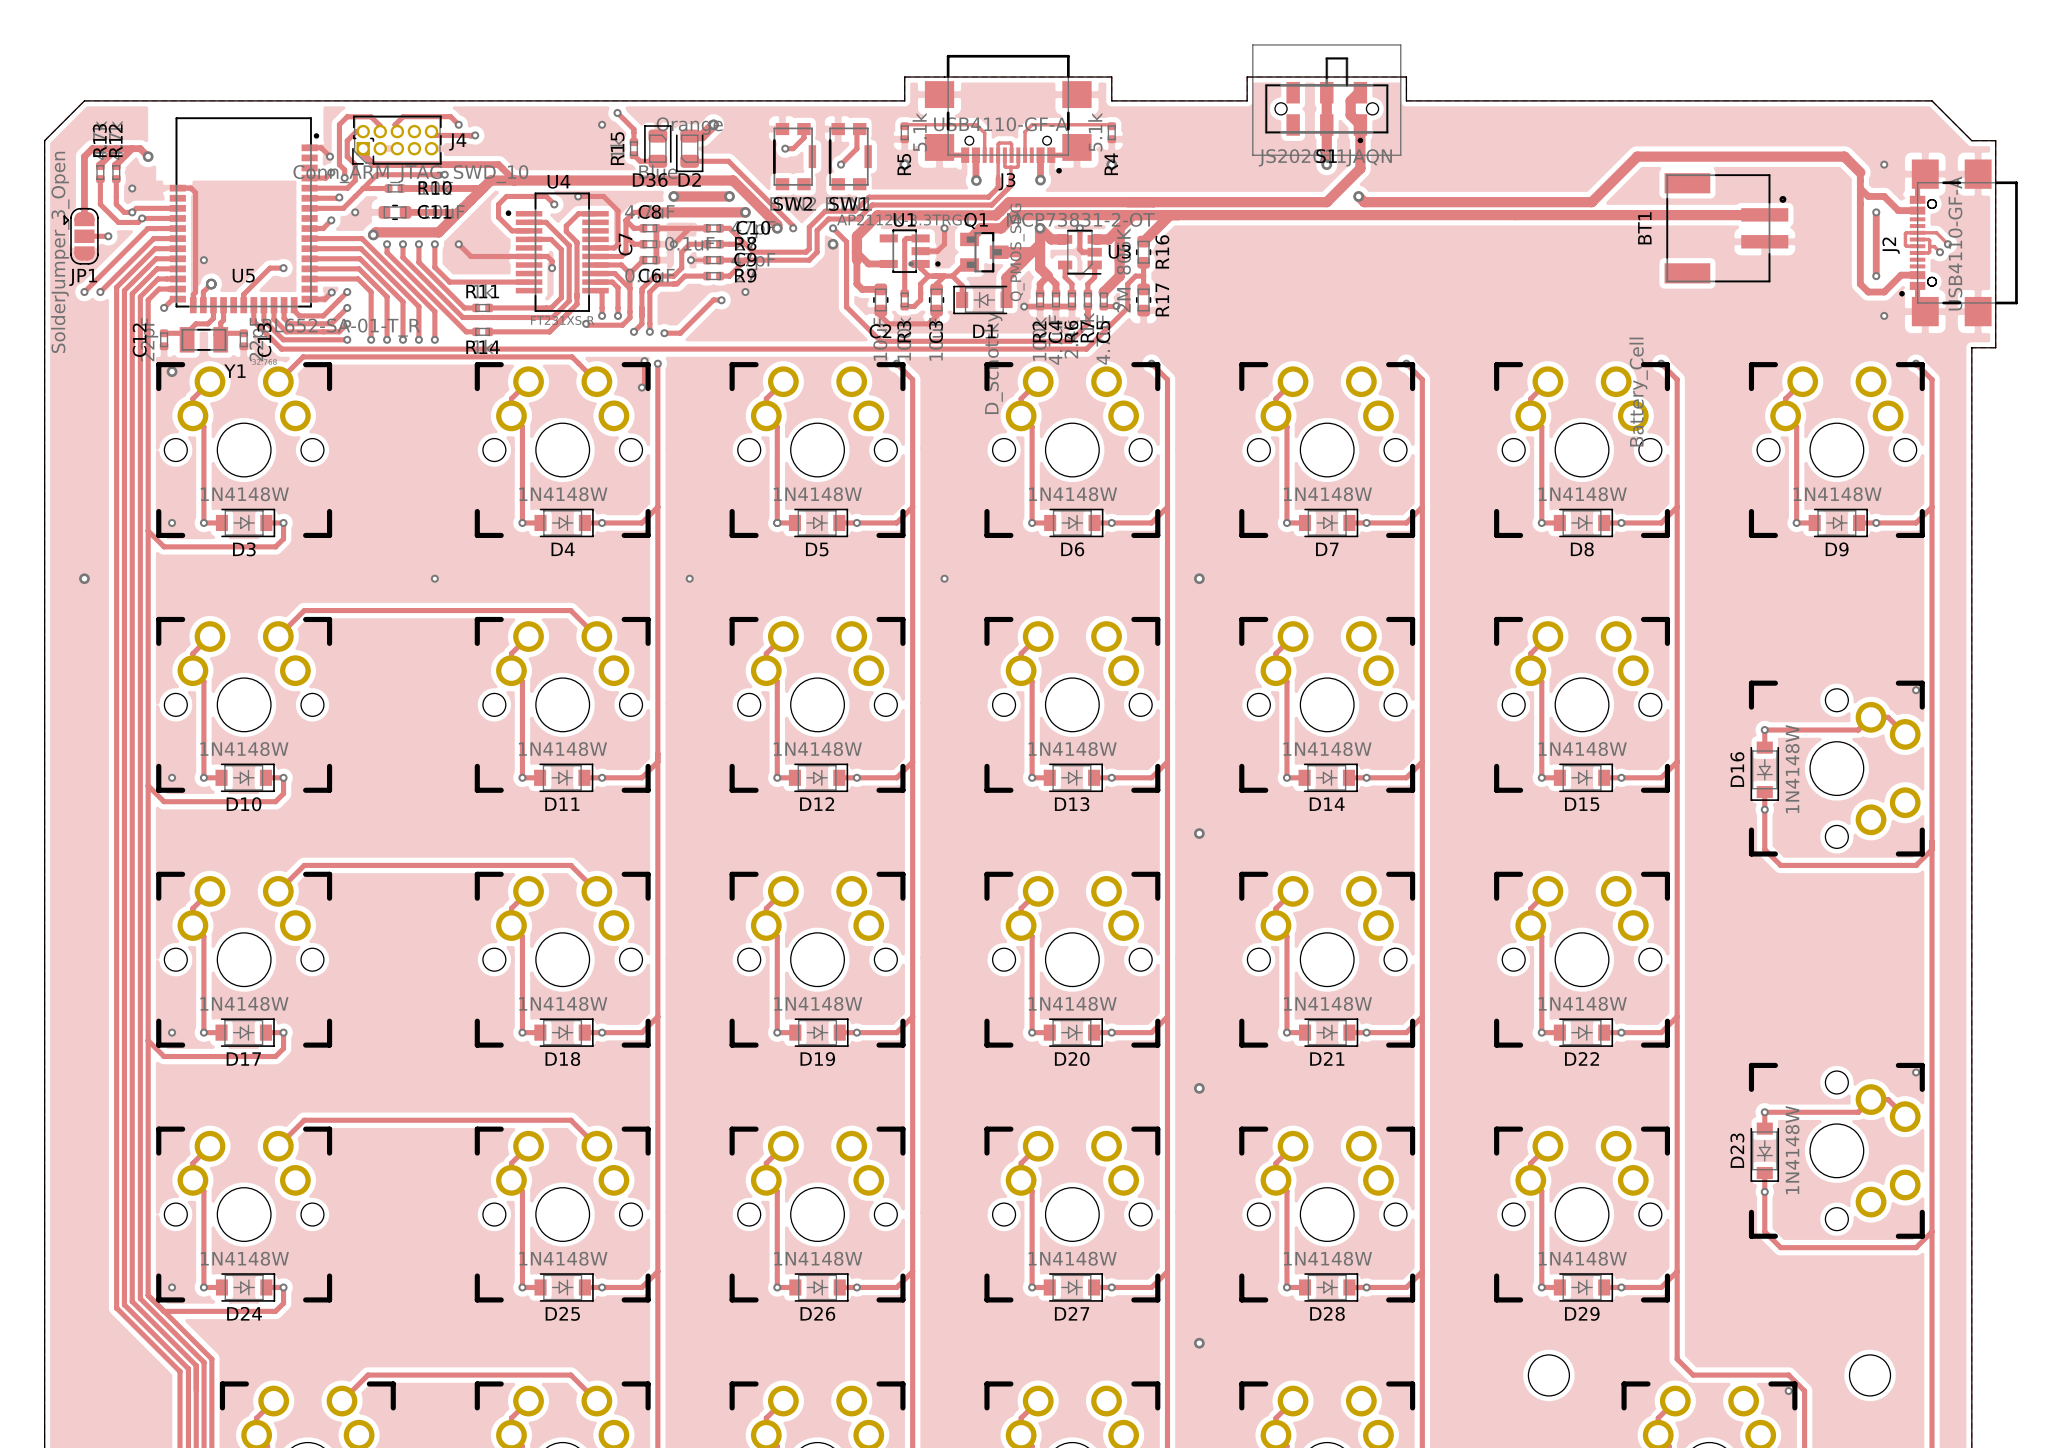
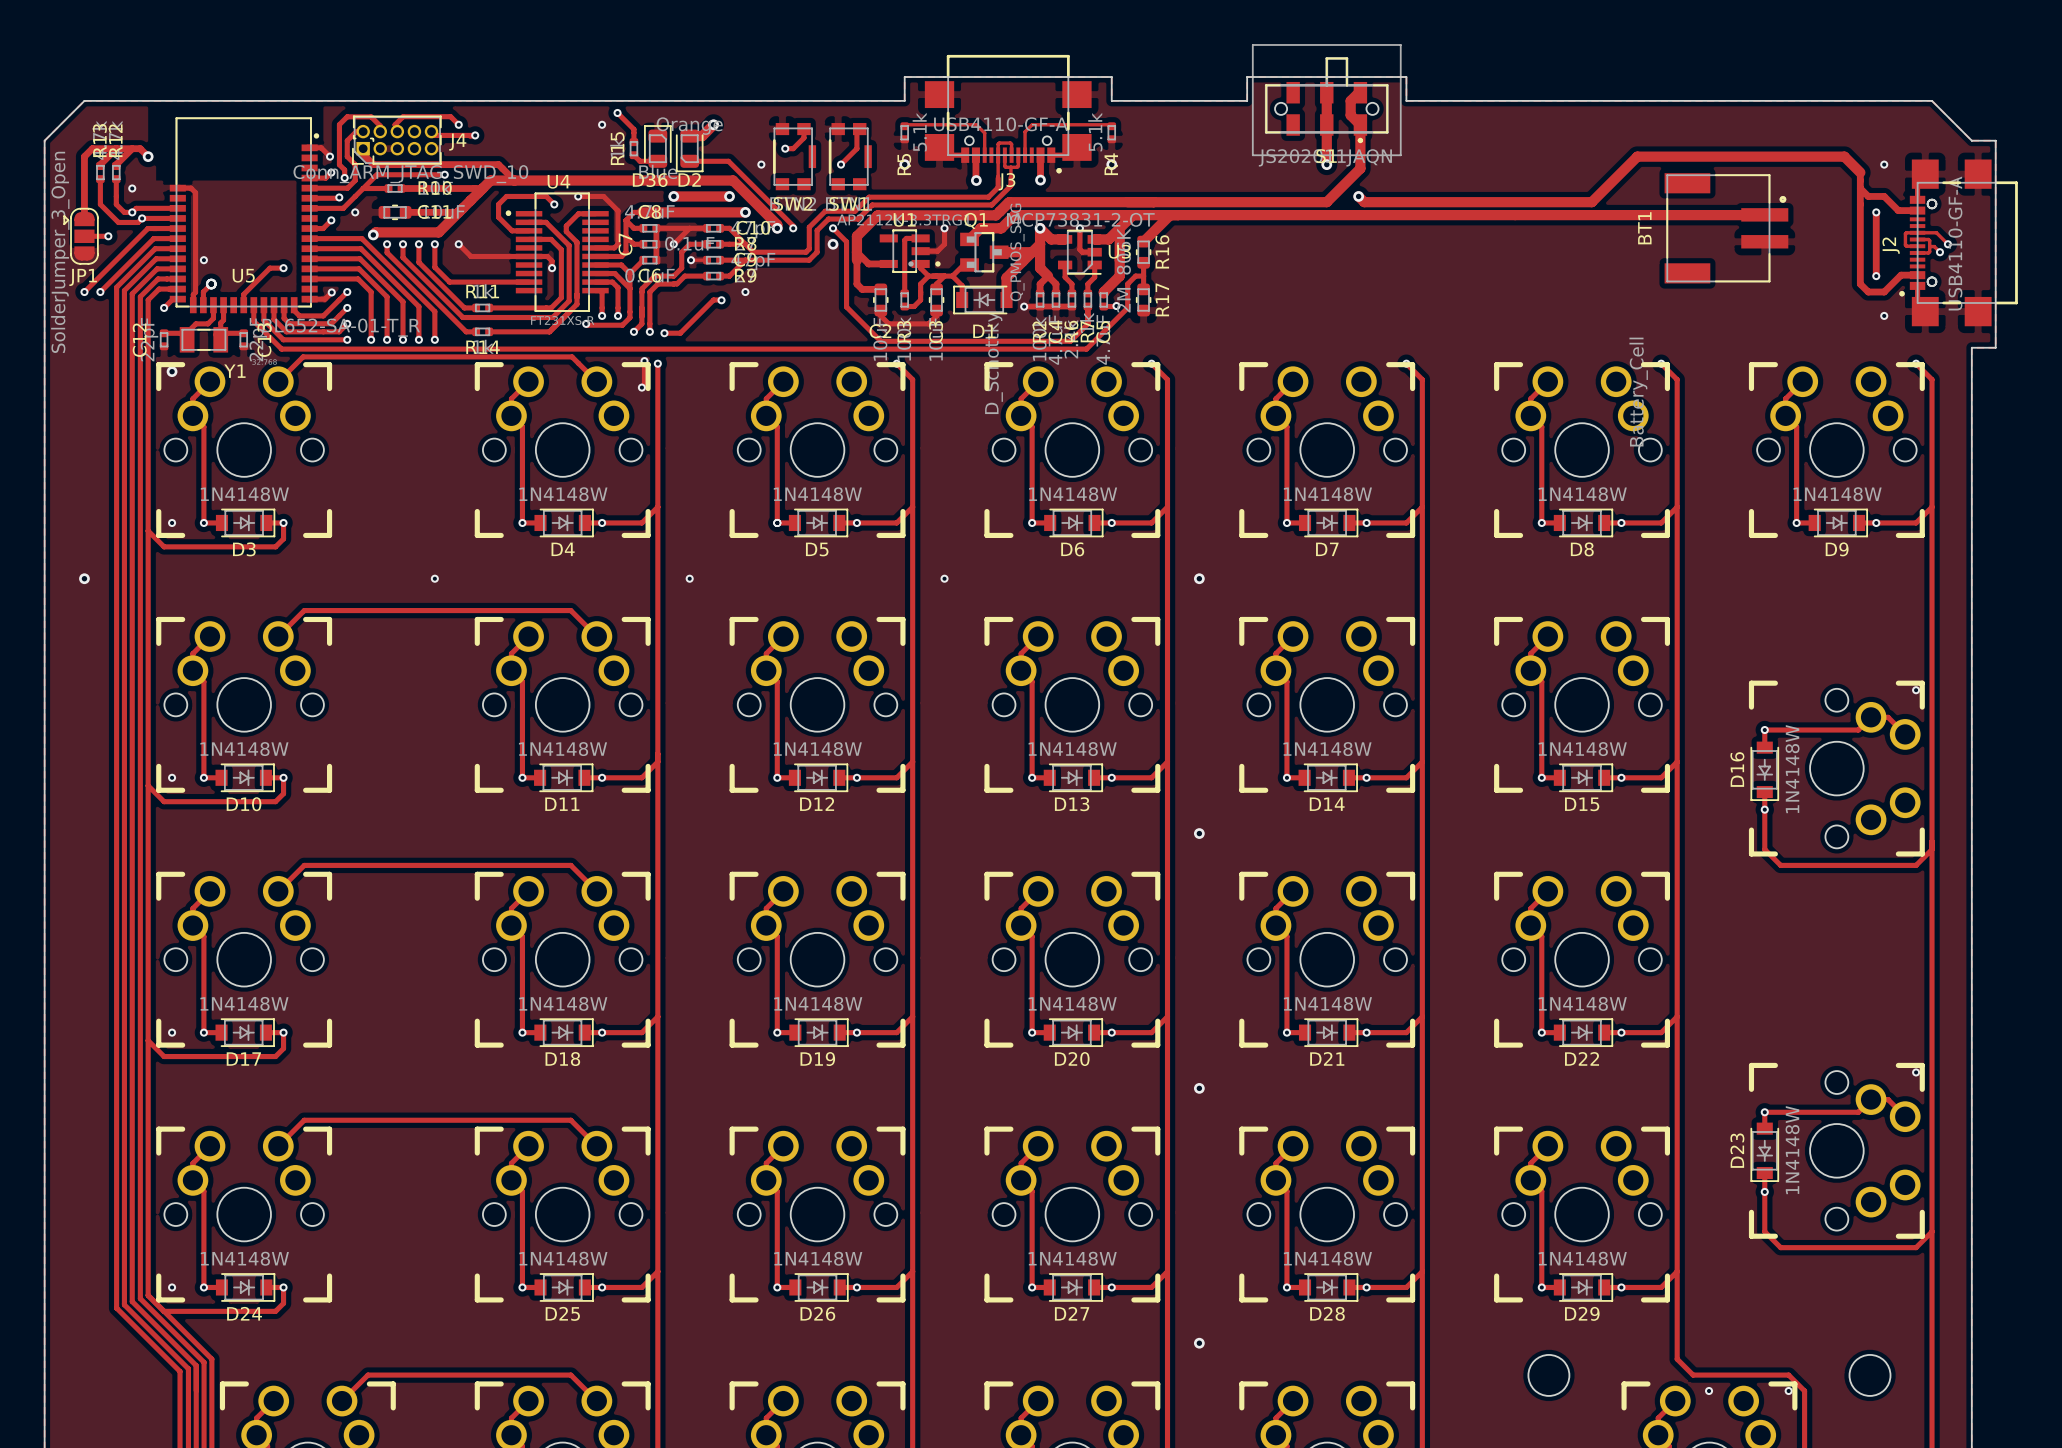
via: none -> (761, 164)
via: none -> (1709, 1391)

